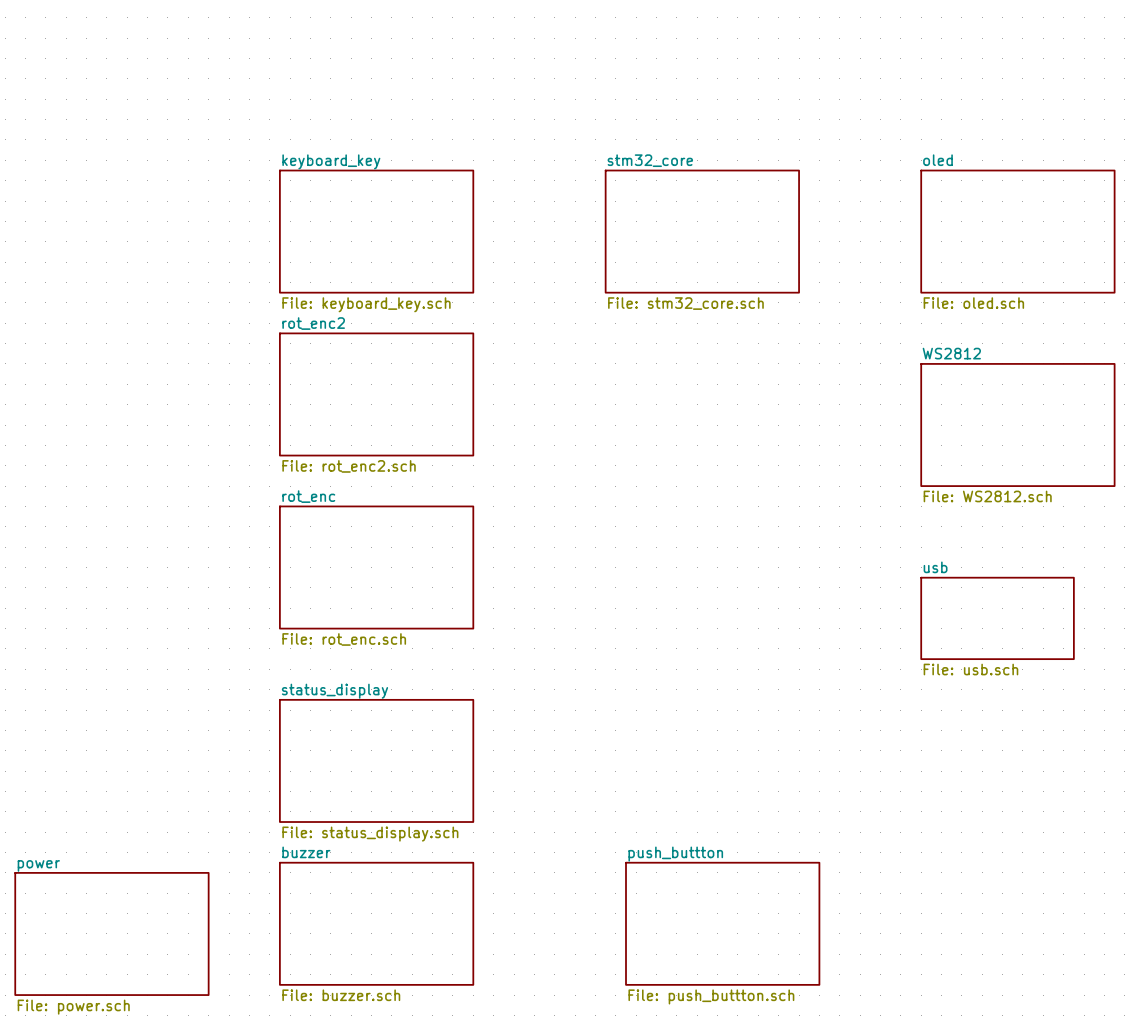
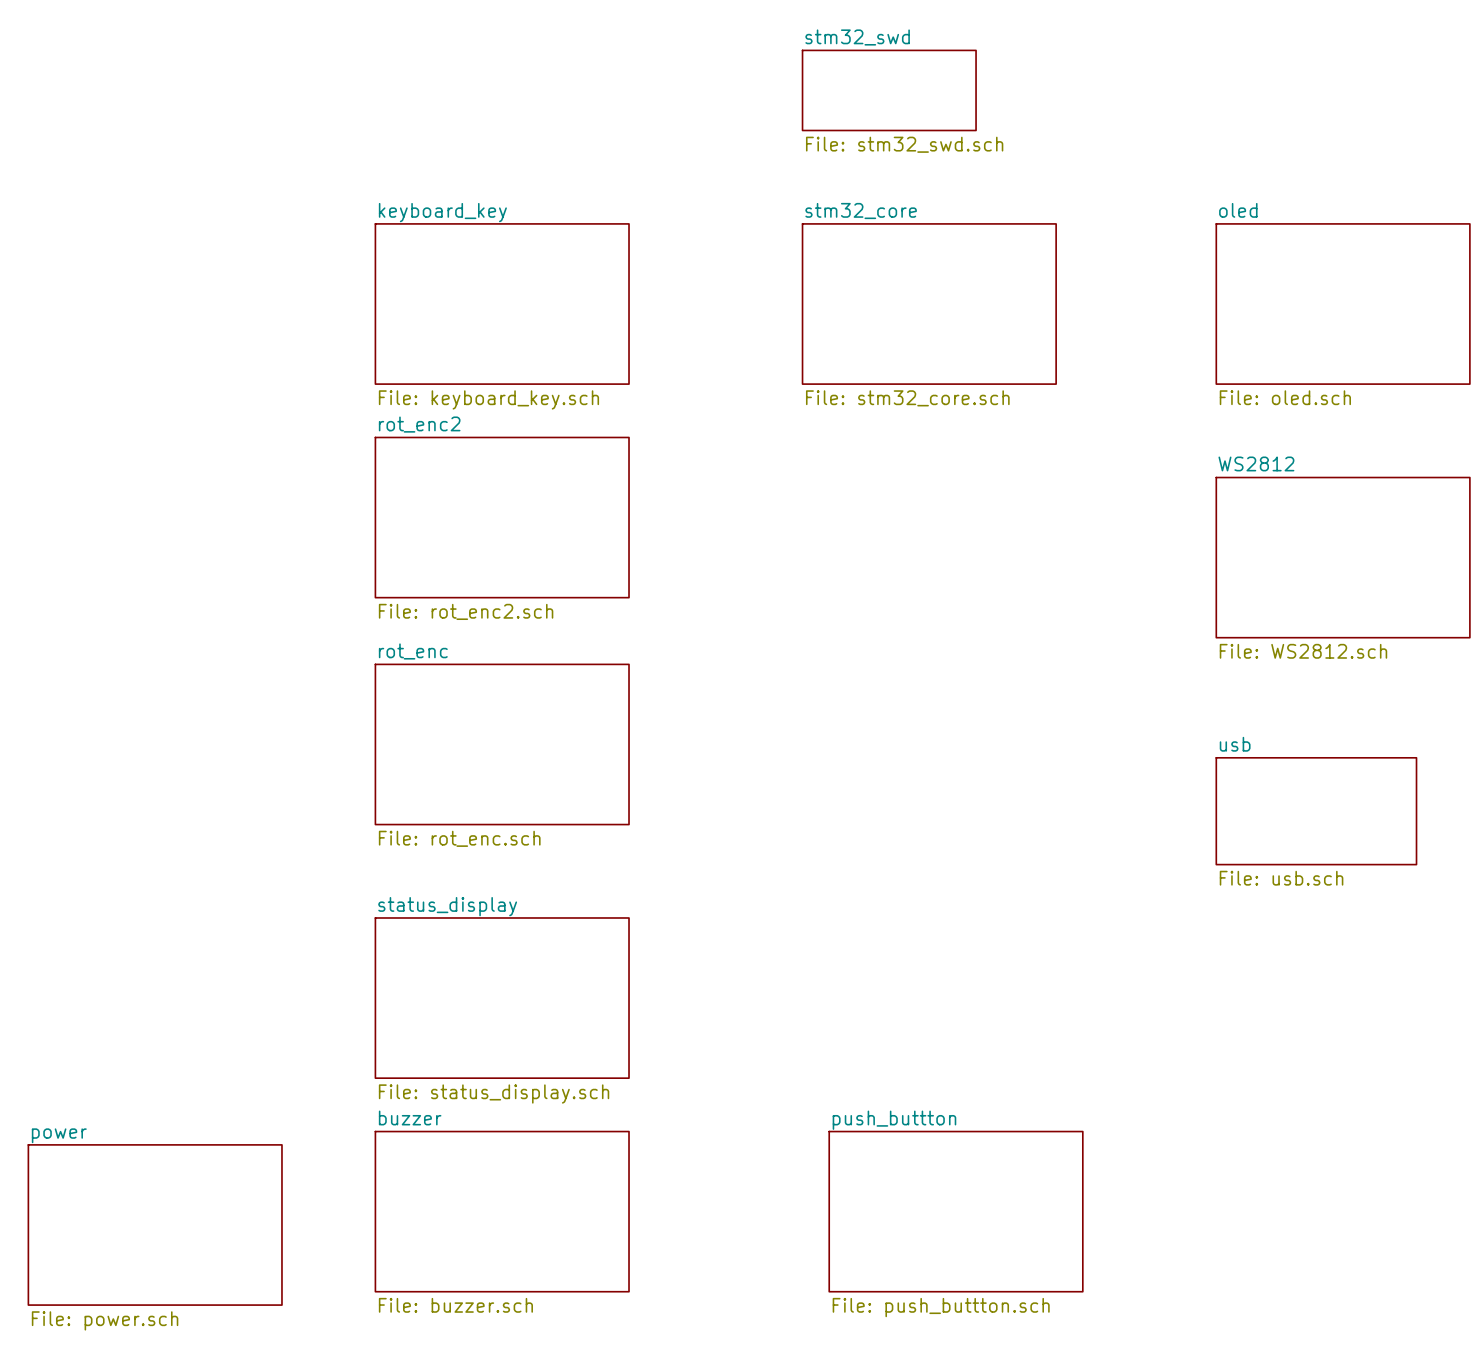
sheet stm32_swd: none -> File: stm32_swd.sch (889, 90)

